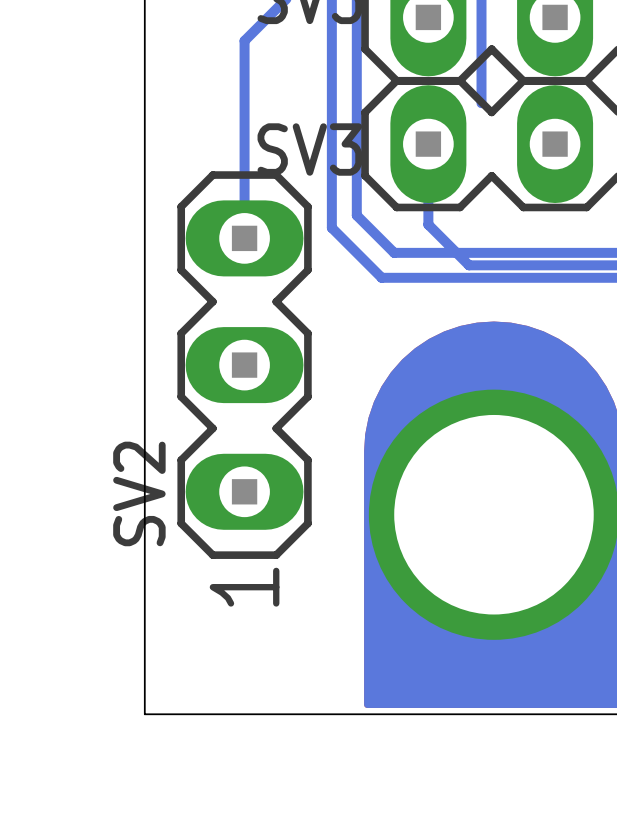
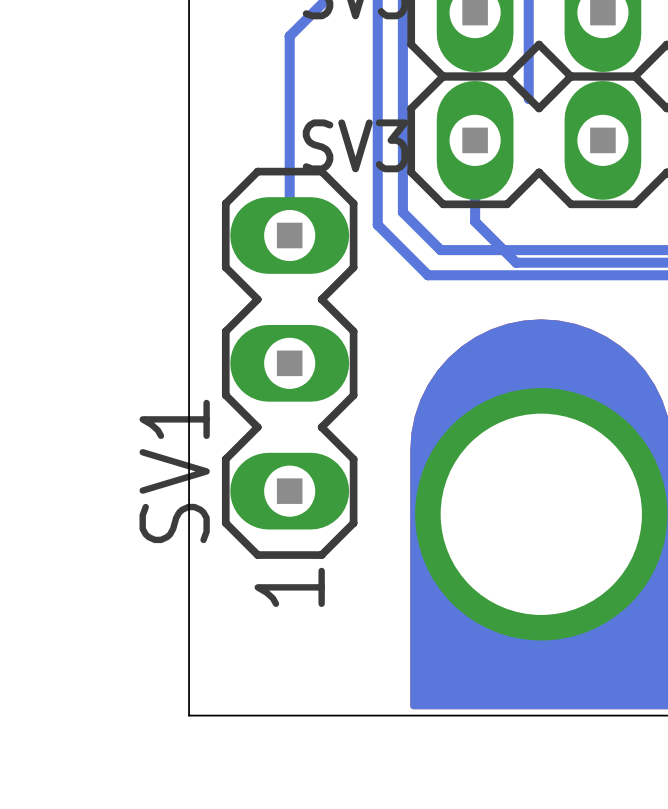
SV2 name: SV2 (139, 493) -> SV1 (174, 471)

